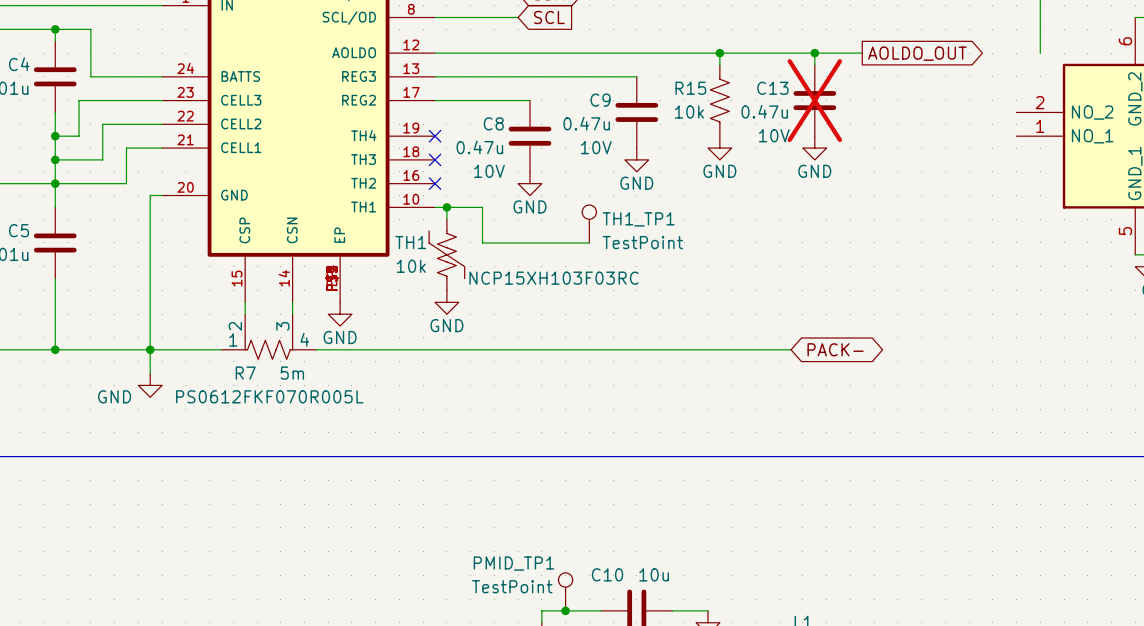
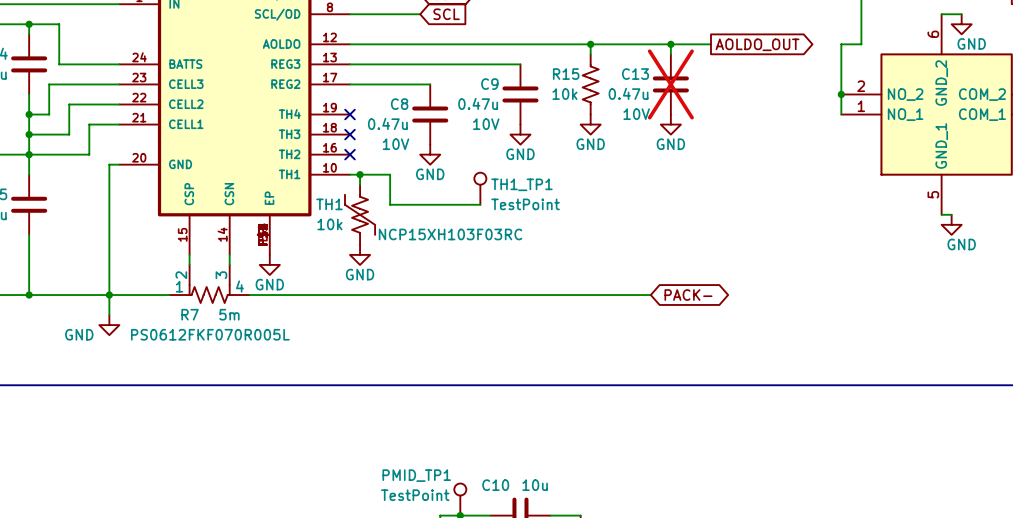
wire: none -> (861, 44) (841, 44) (841, 114)
junction: none -> (841, 94)

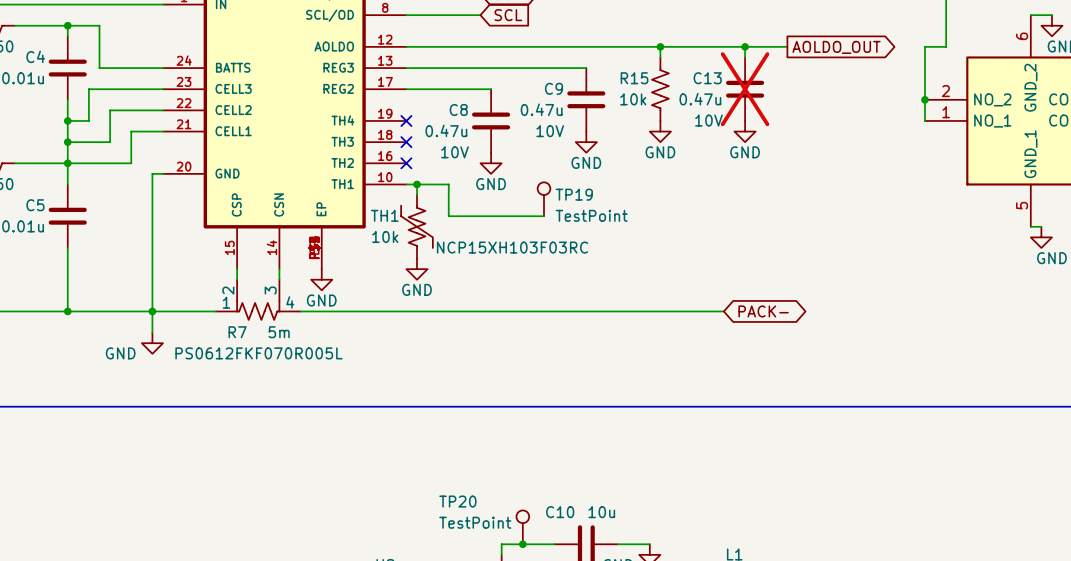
TH1_TP1 name: TH1_TP1 (521, 184) -> TP19 (574, 194)
PMID_TP1 name: PMID_TP1 (416, 475) -> TP20 (457, 501)

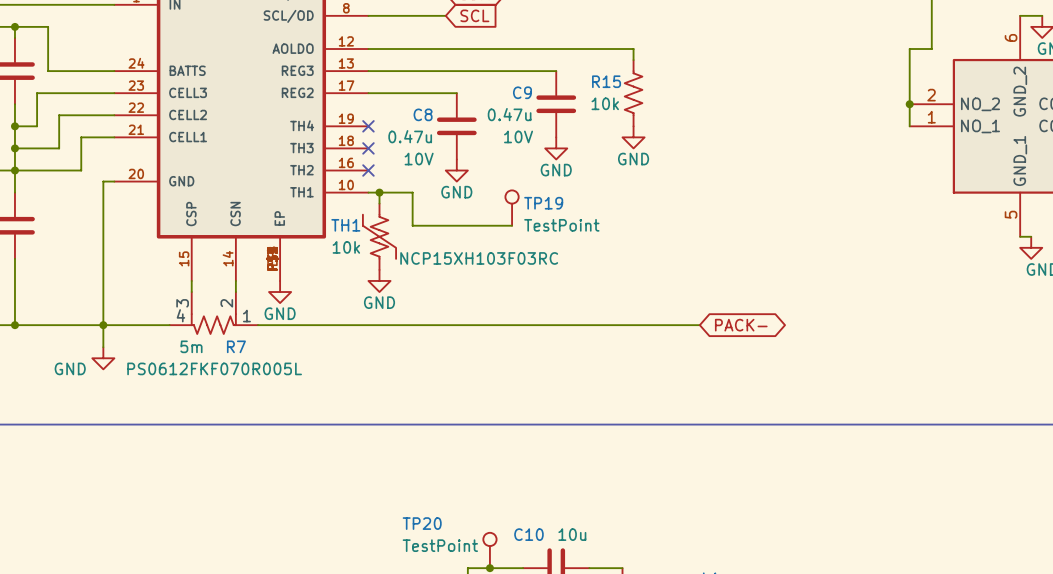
wire: (660, 46) (787, 46) -> none
junction: (660, 46) -> none
wire: (745, 46) (745, 57) -> none
junction: (745, 46) -> none
global label: AOLDO_OUT (836, 47) -> none
C13: 0.47u (745, 89) -> none
power symbol: GND (745, 131) -> none
R7 flip: as is (258, 310) -> left-right (213, 324)

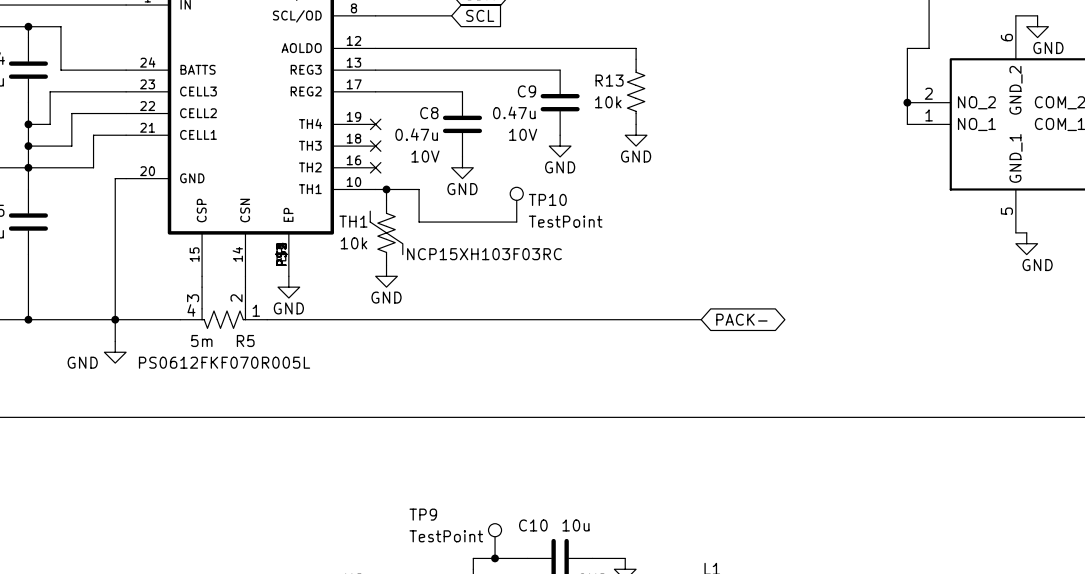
R15 name: R15 (606, 81) -> R13 (609, 80)
TP19 name: TP19 (543, 203) -> TP10 (547, 199)
R7 name: R7 (236, 346) -> R5 (245, 340)
TP20 name: TP20 (422, 523) -> TP9 (423, 514)

